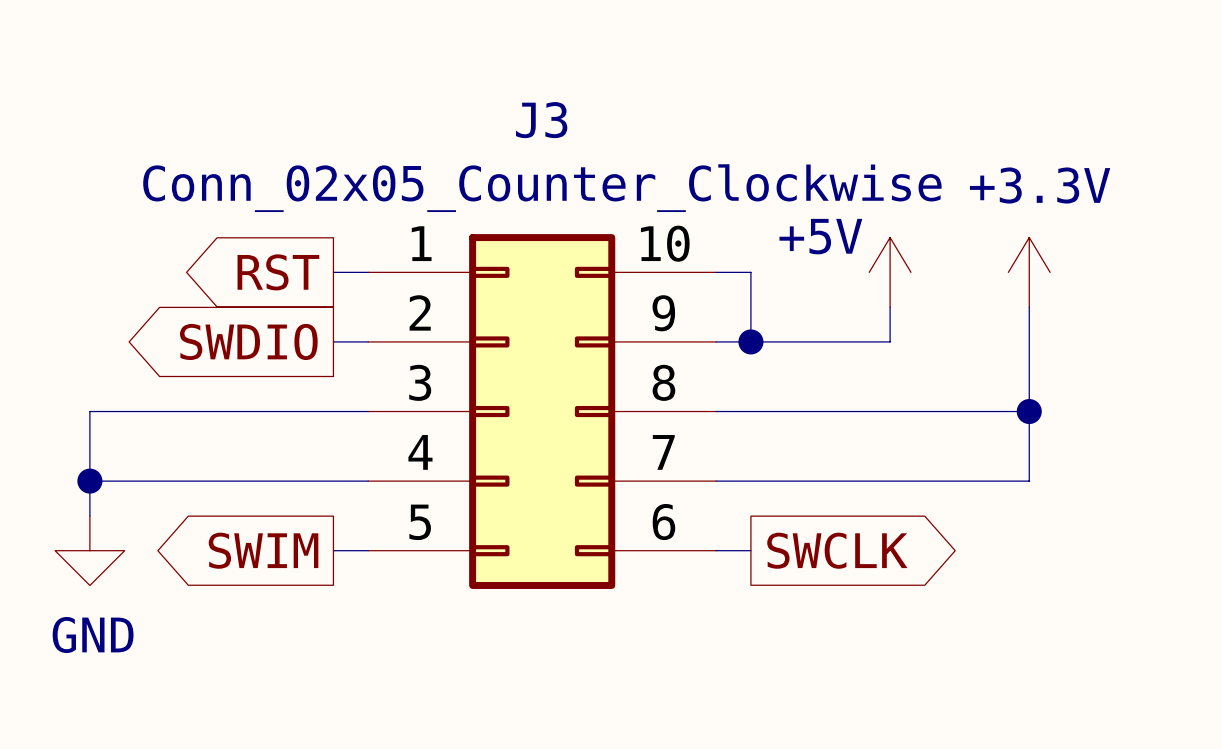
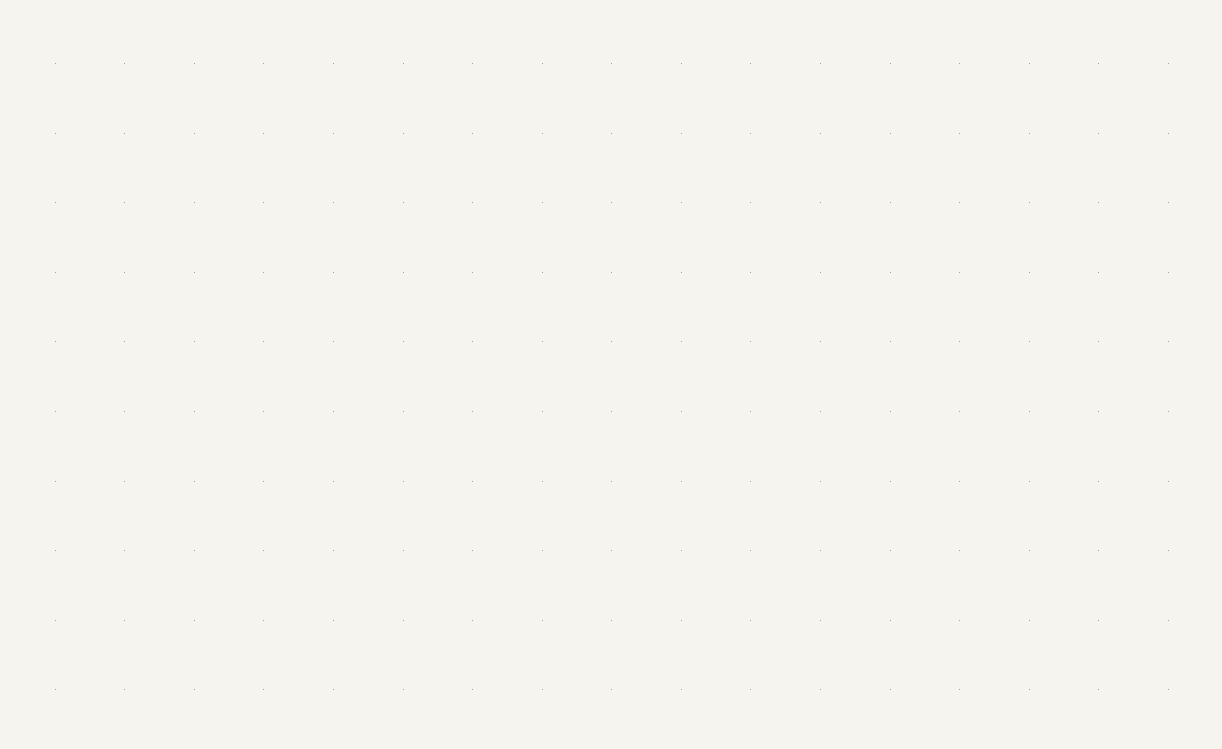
global label: RST (278, 272) -> none
wire: (333, 272) (368, 272) -> none
wire: (716, 272) (750, 272) (750, 341) -> none
power symbol: +5V (890, 272) -> none
power symbol: +3.3V (1029, 272) -> none
wire: (890, 307) (890, 341) (716, 341) -> none
wire: (1029, 307) (1029, 481) (716, 481) -> none
global label: SWDIO (248, 341) -> none
wire: (333, 341) (368, 341) -> none
junction: (750, 341) -> none
wire: (368, 411) (89, 411) (89, 515) -> none
J3: Conn_02x05_Counter_Clockwise (542, 411) -> none
wire: (716, 411) (1029, 411) -> none
junction: (1029, 411) -> none
wire: (89, 481) (368, 481) -> none
junction: (89, 481) -> none
power symbol: GND (89, 550) -> none
global label: SWIM (263, 550) -> none
wire: (333, 550) (368, 550) -> none
wire: (716, 550) (750, 550) -> none
global label: SWCLK (837, 550) -> none

